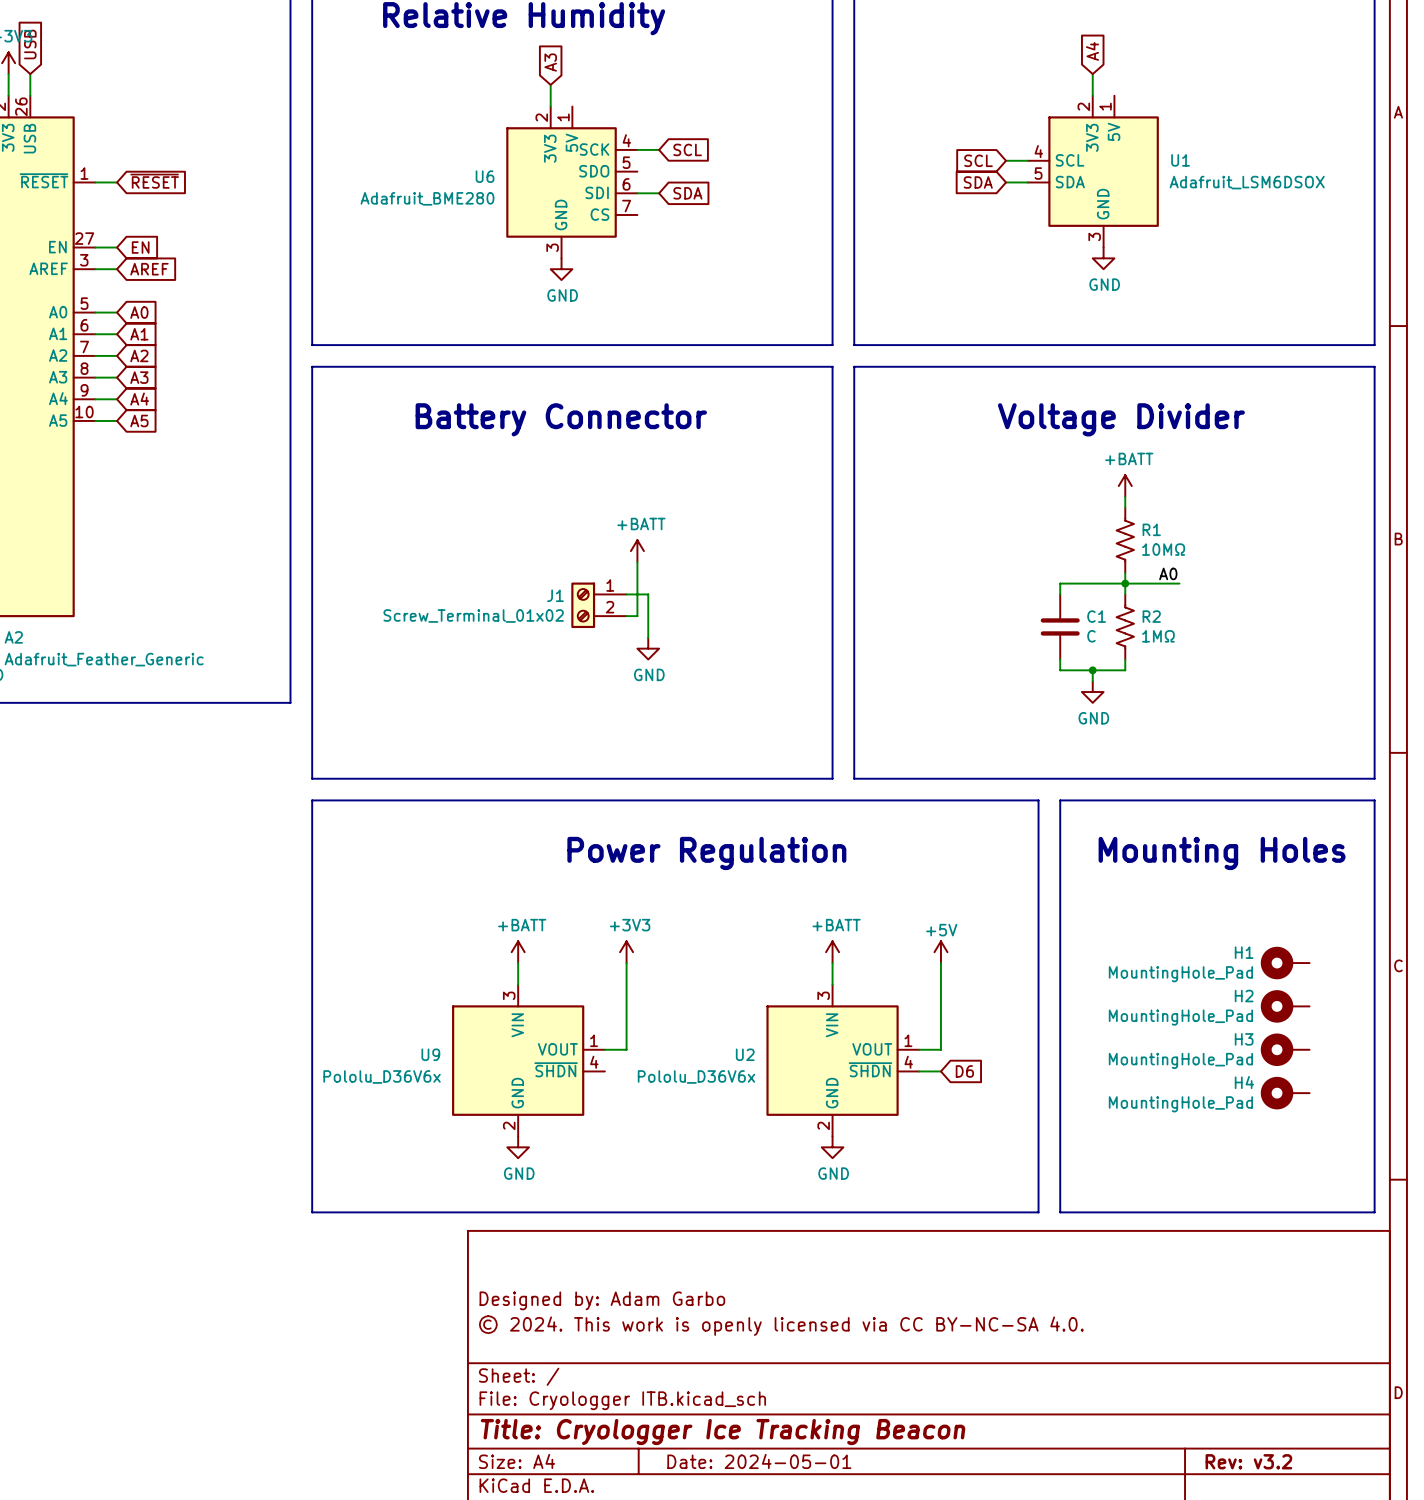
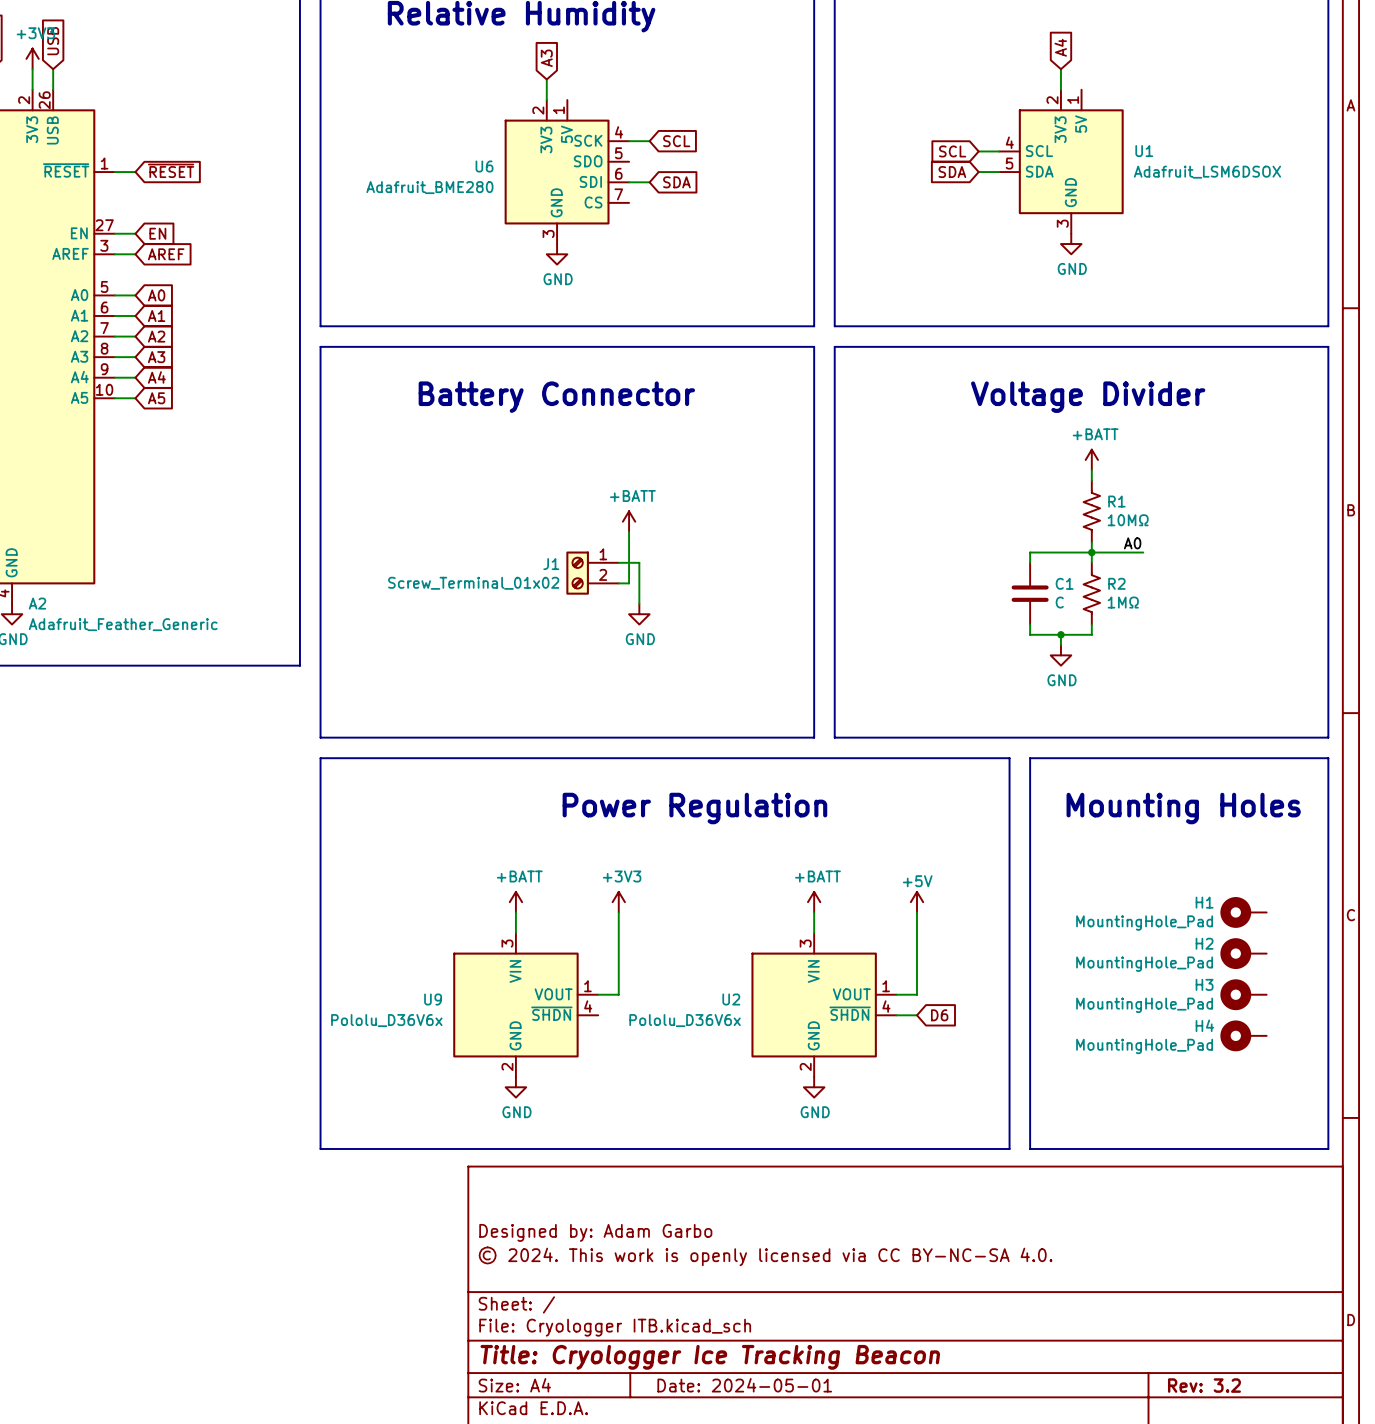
title block: Rev: v3.2 (1248, 1461) -> Rev: 3.2 (1204, 1385)

